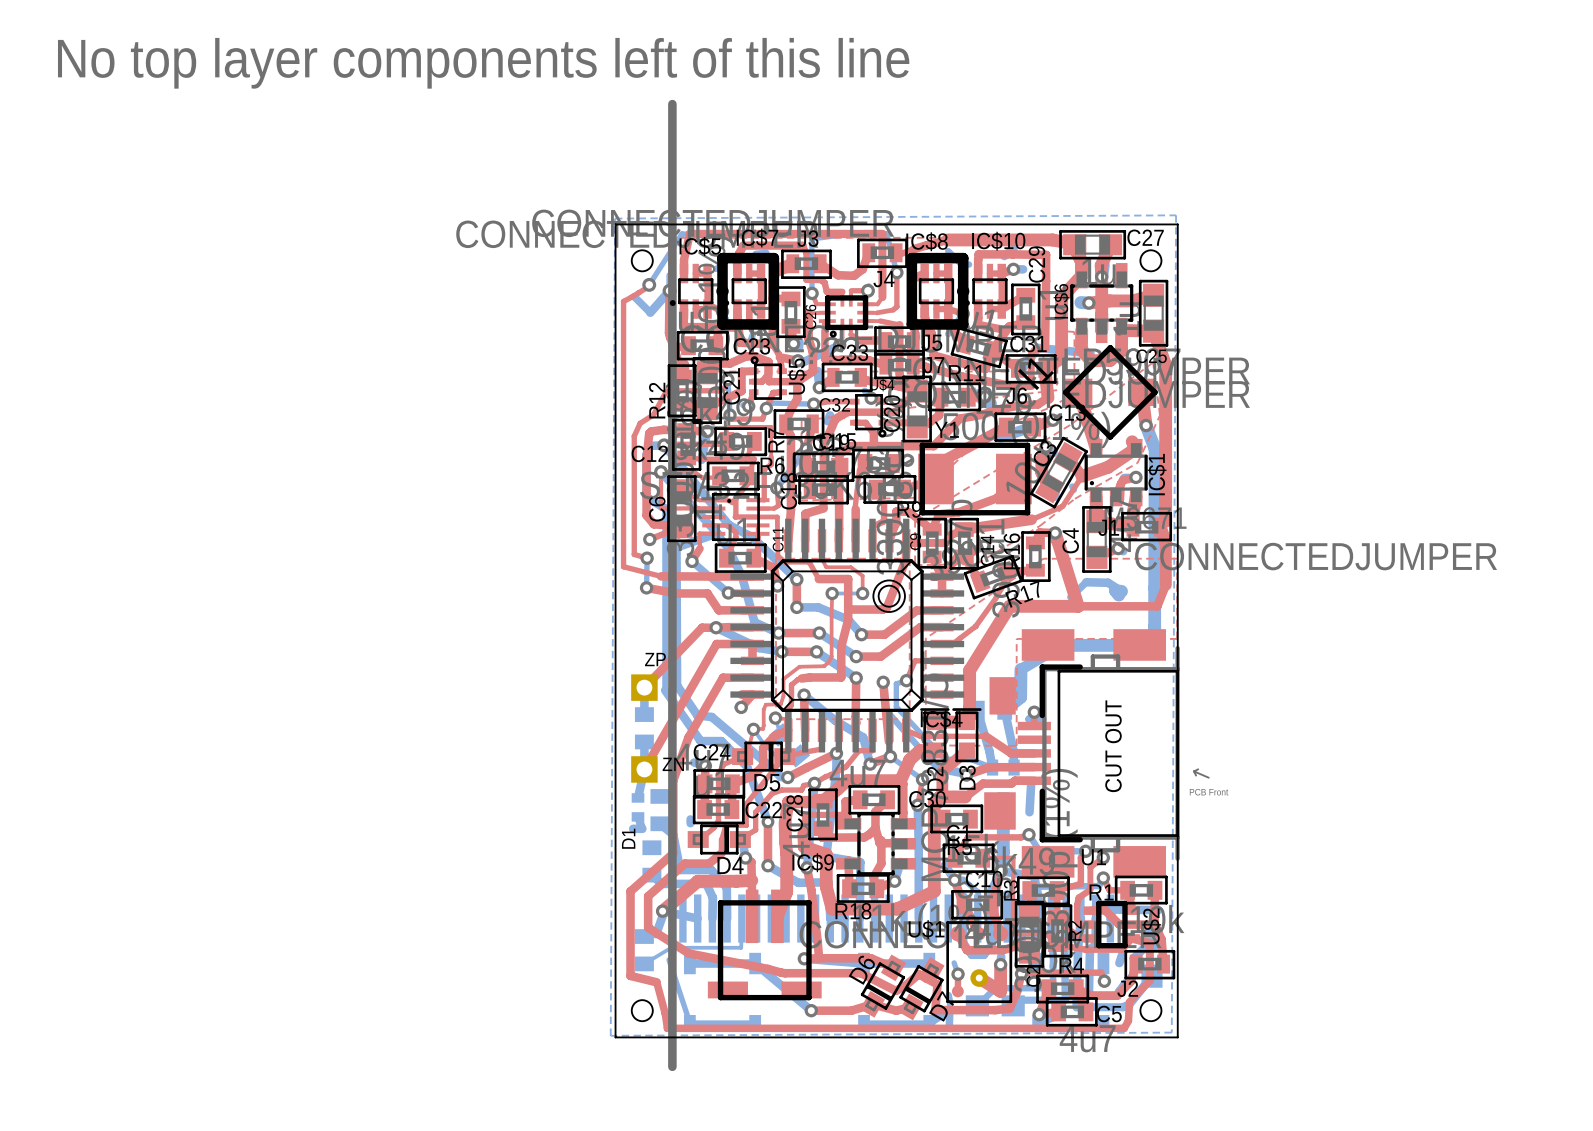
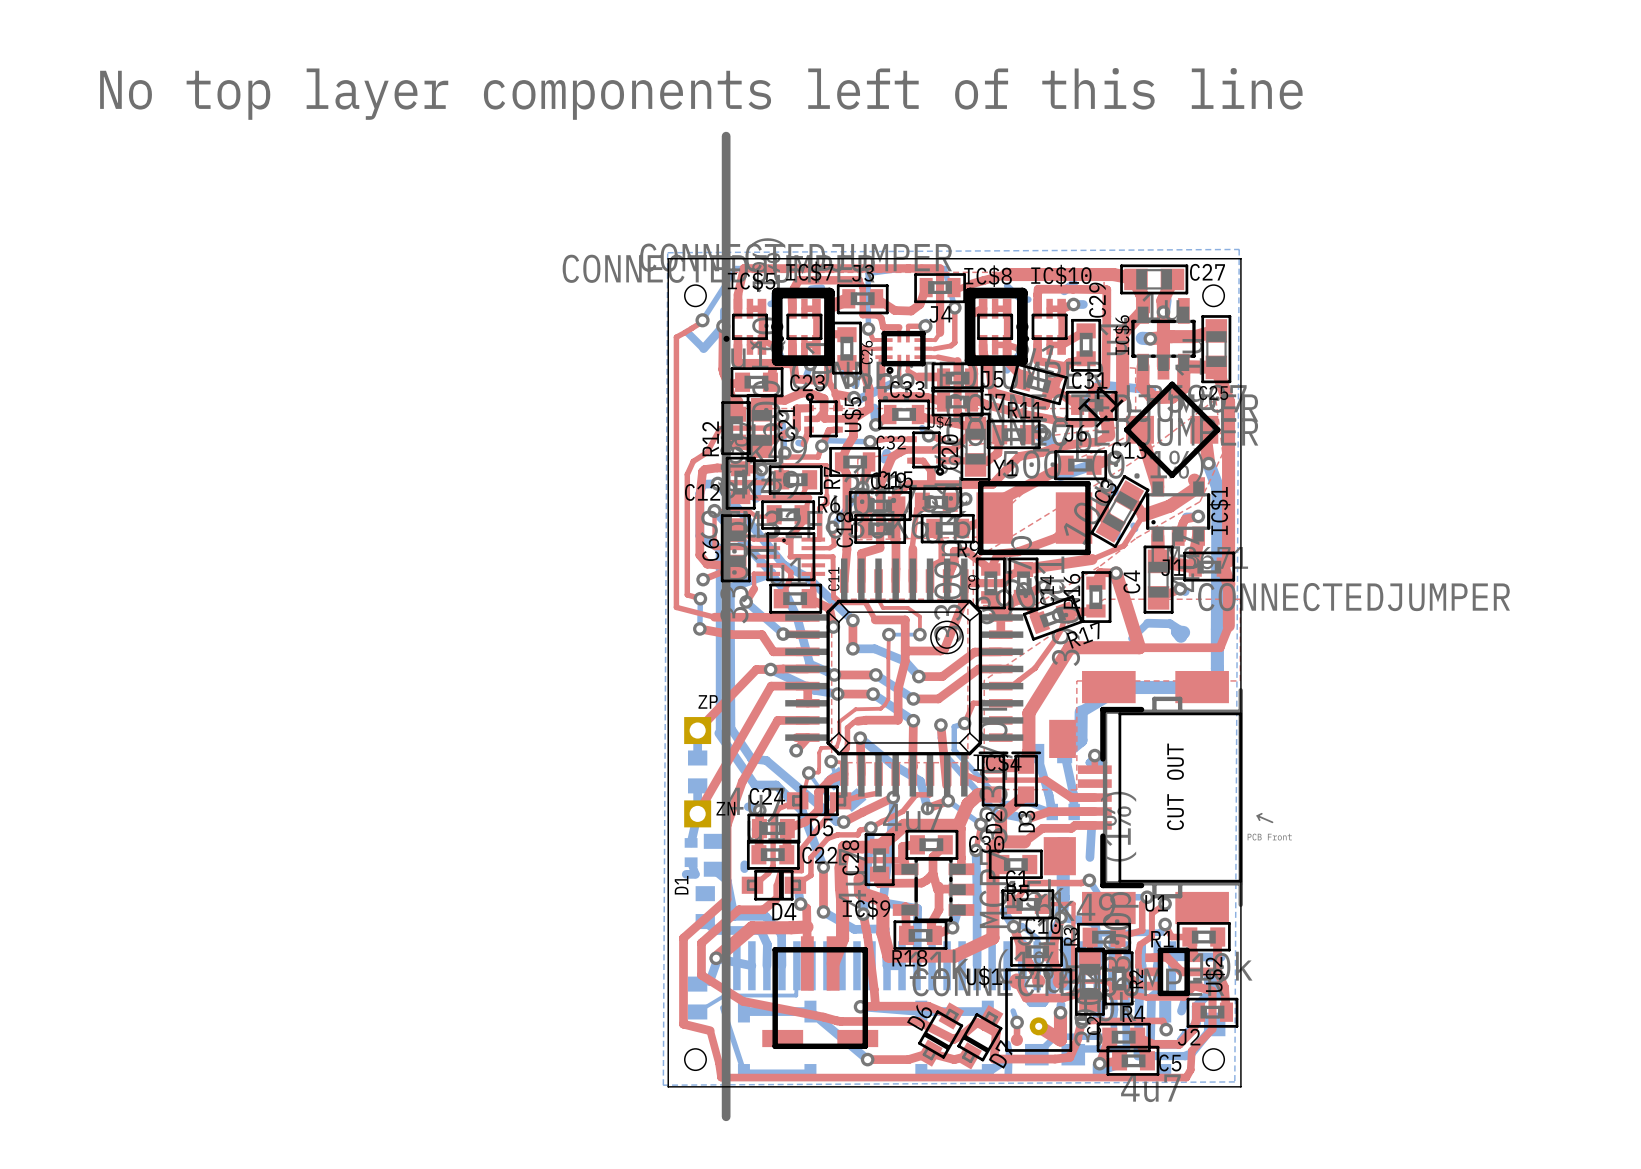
via position: (748, 406) -> (791, 432)

